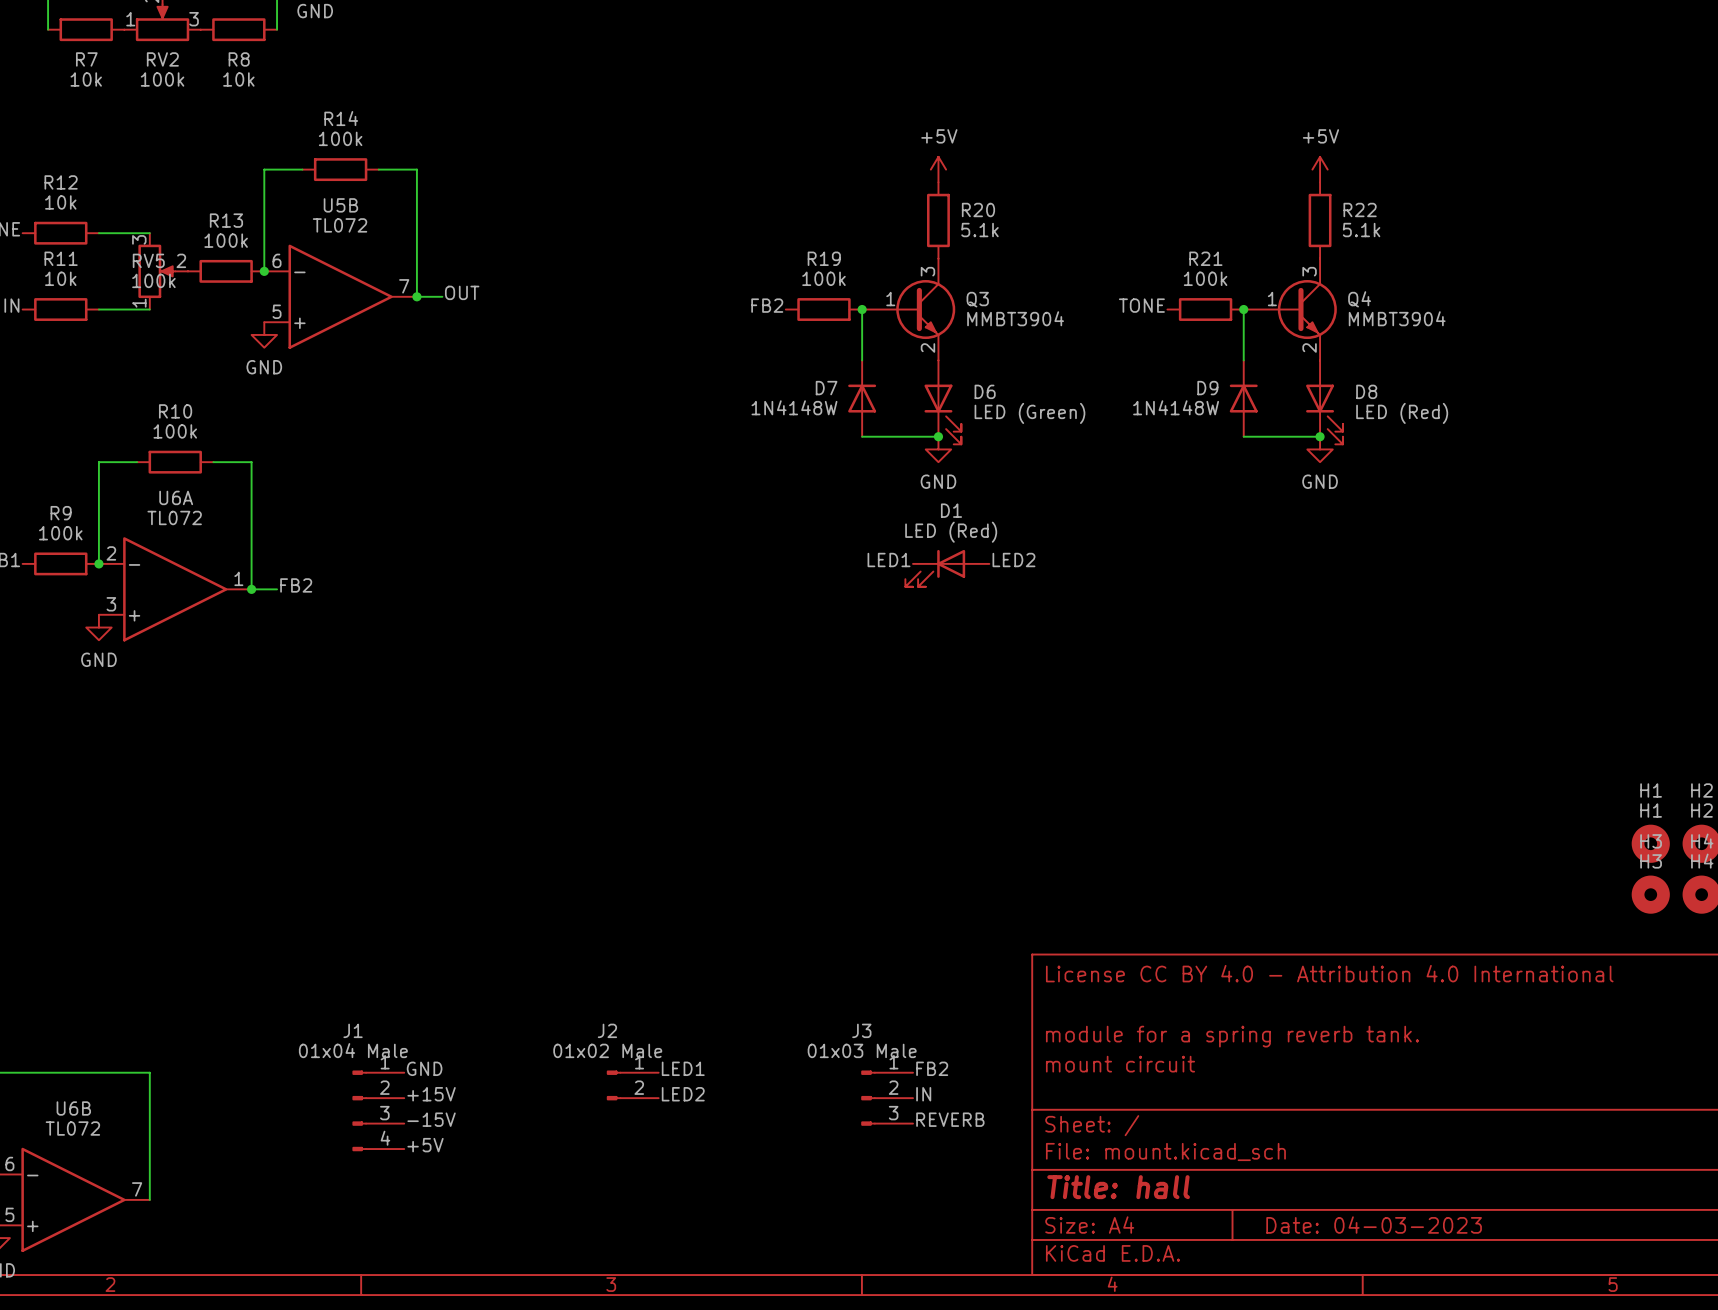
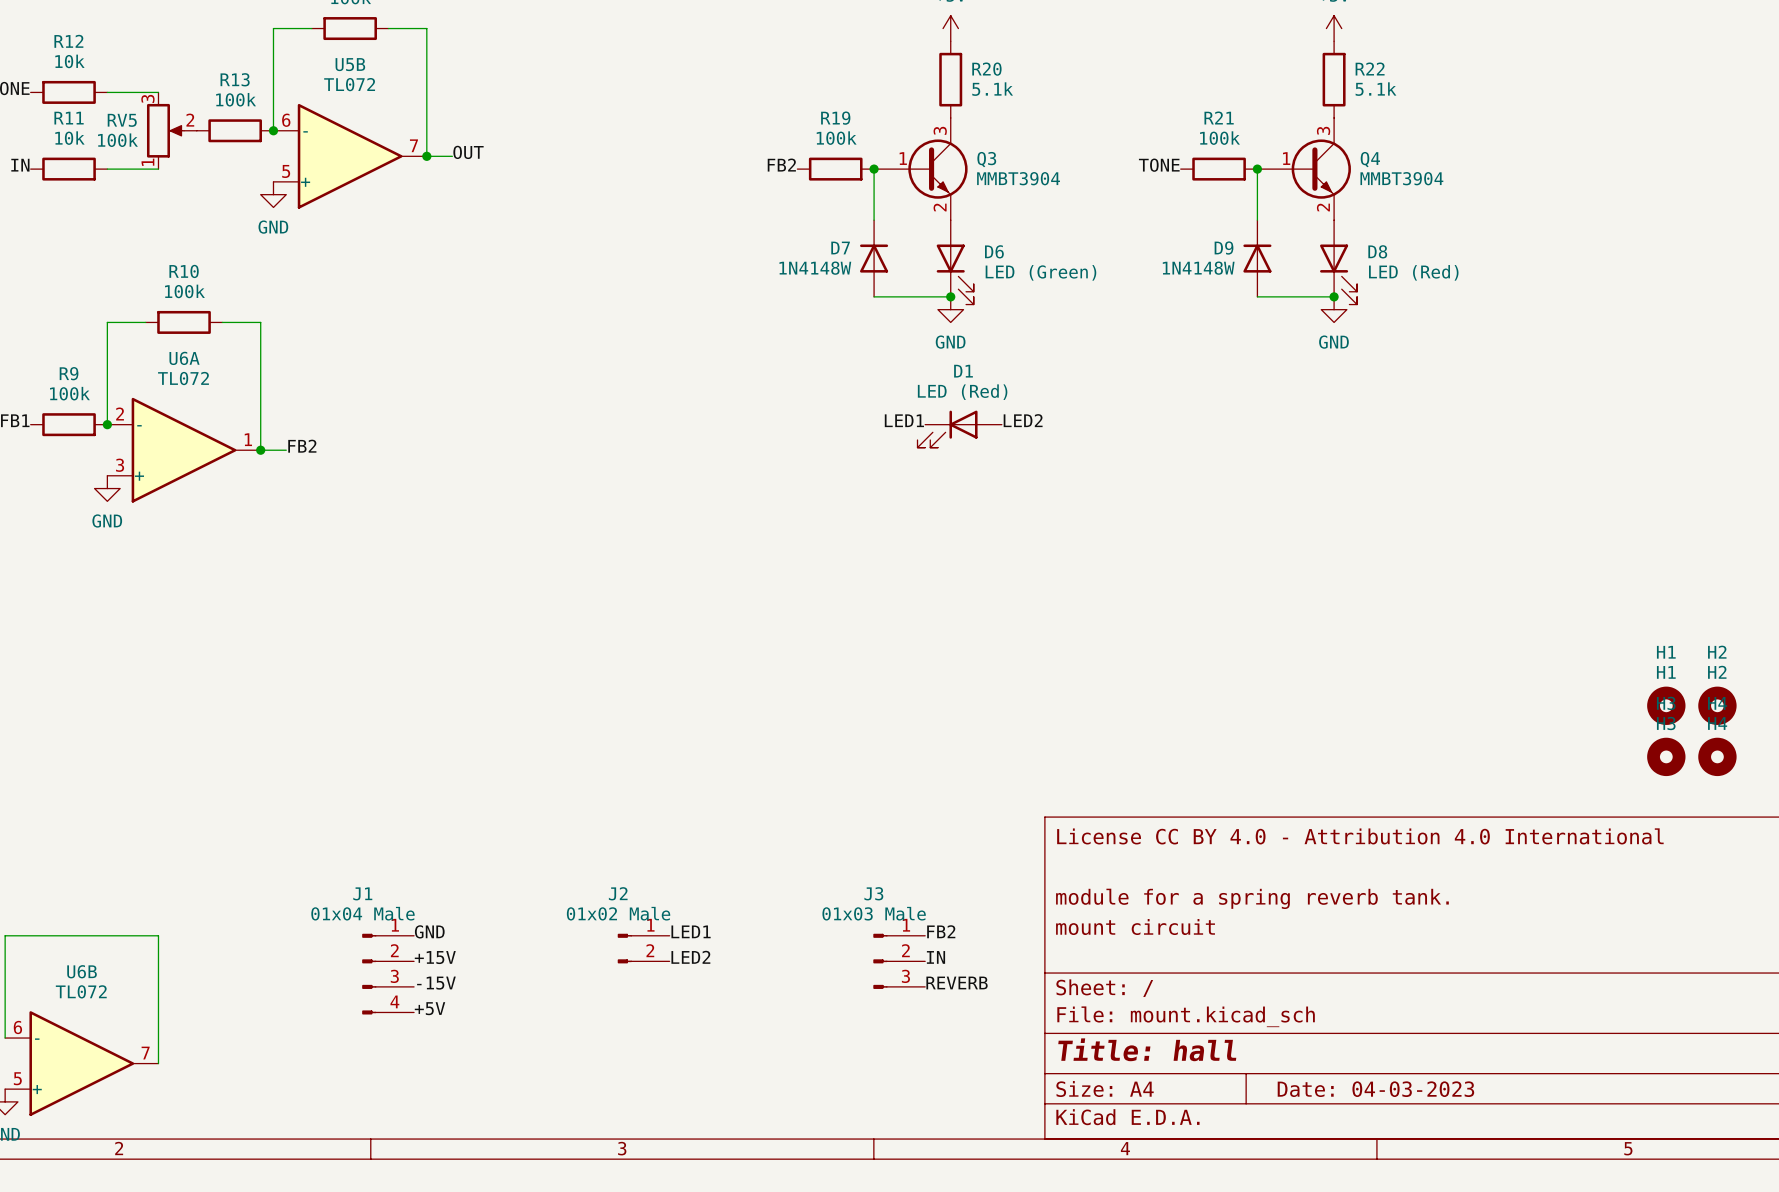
RV5 name position: RV5 (148, 260) -> RV5 (122, 120)
RV5 value position: 100k (153, 280) -> 100k (117, 140)

